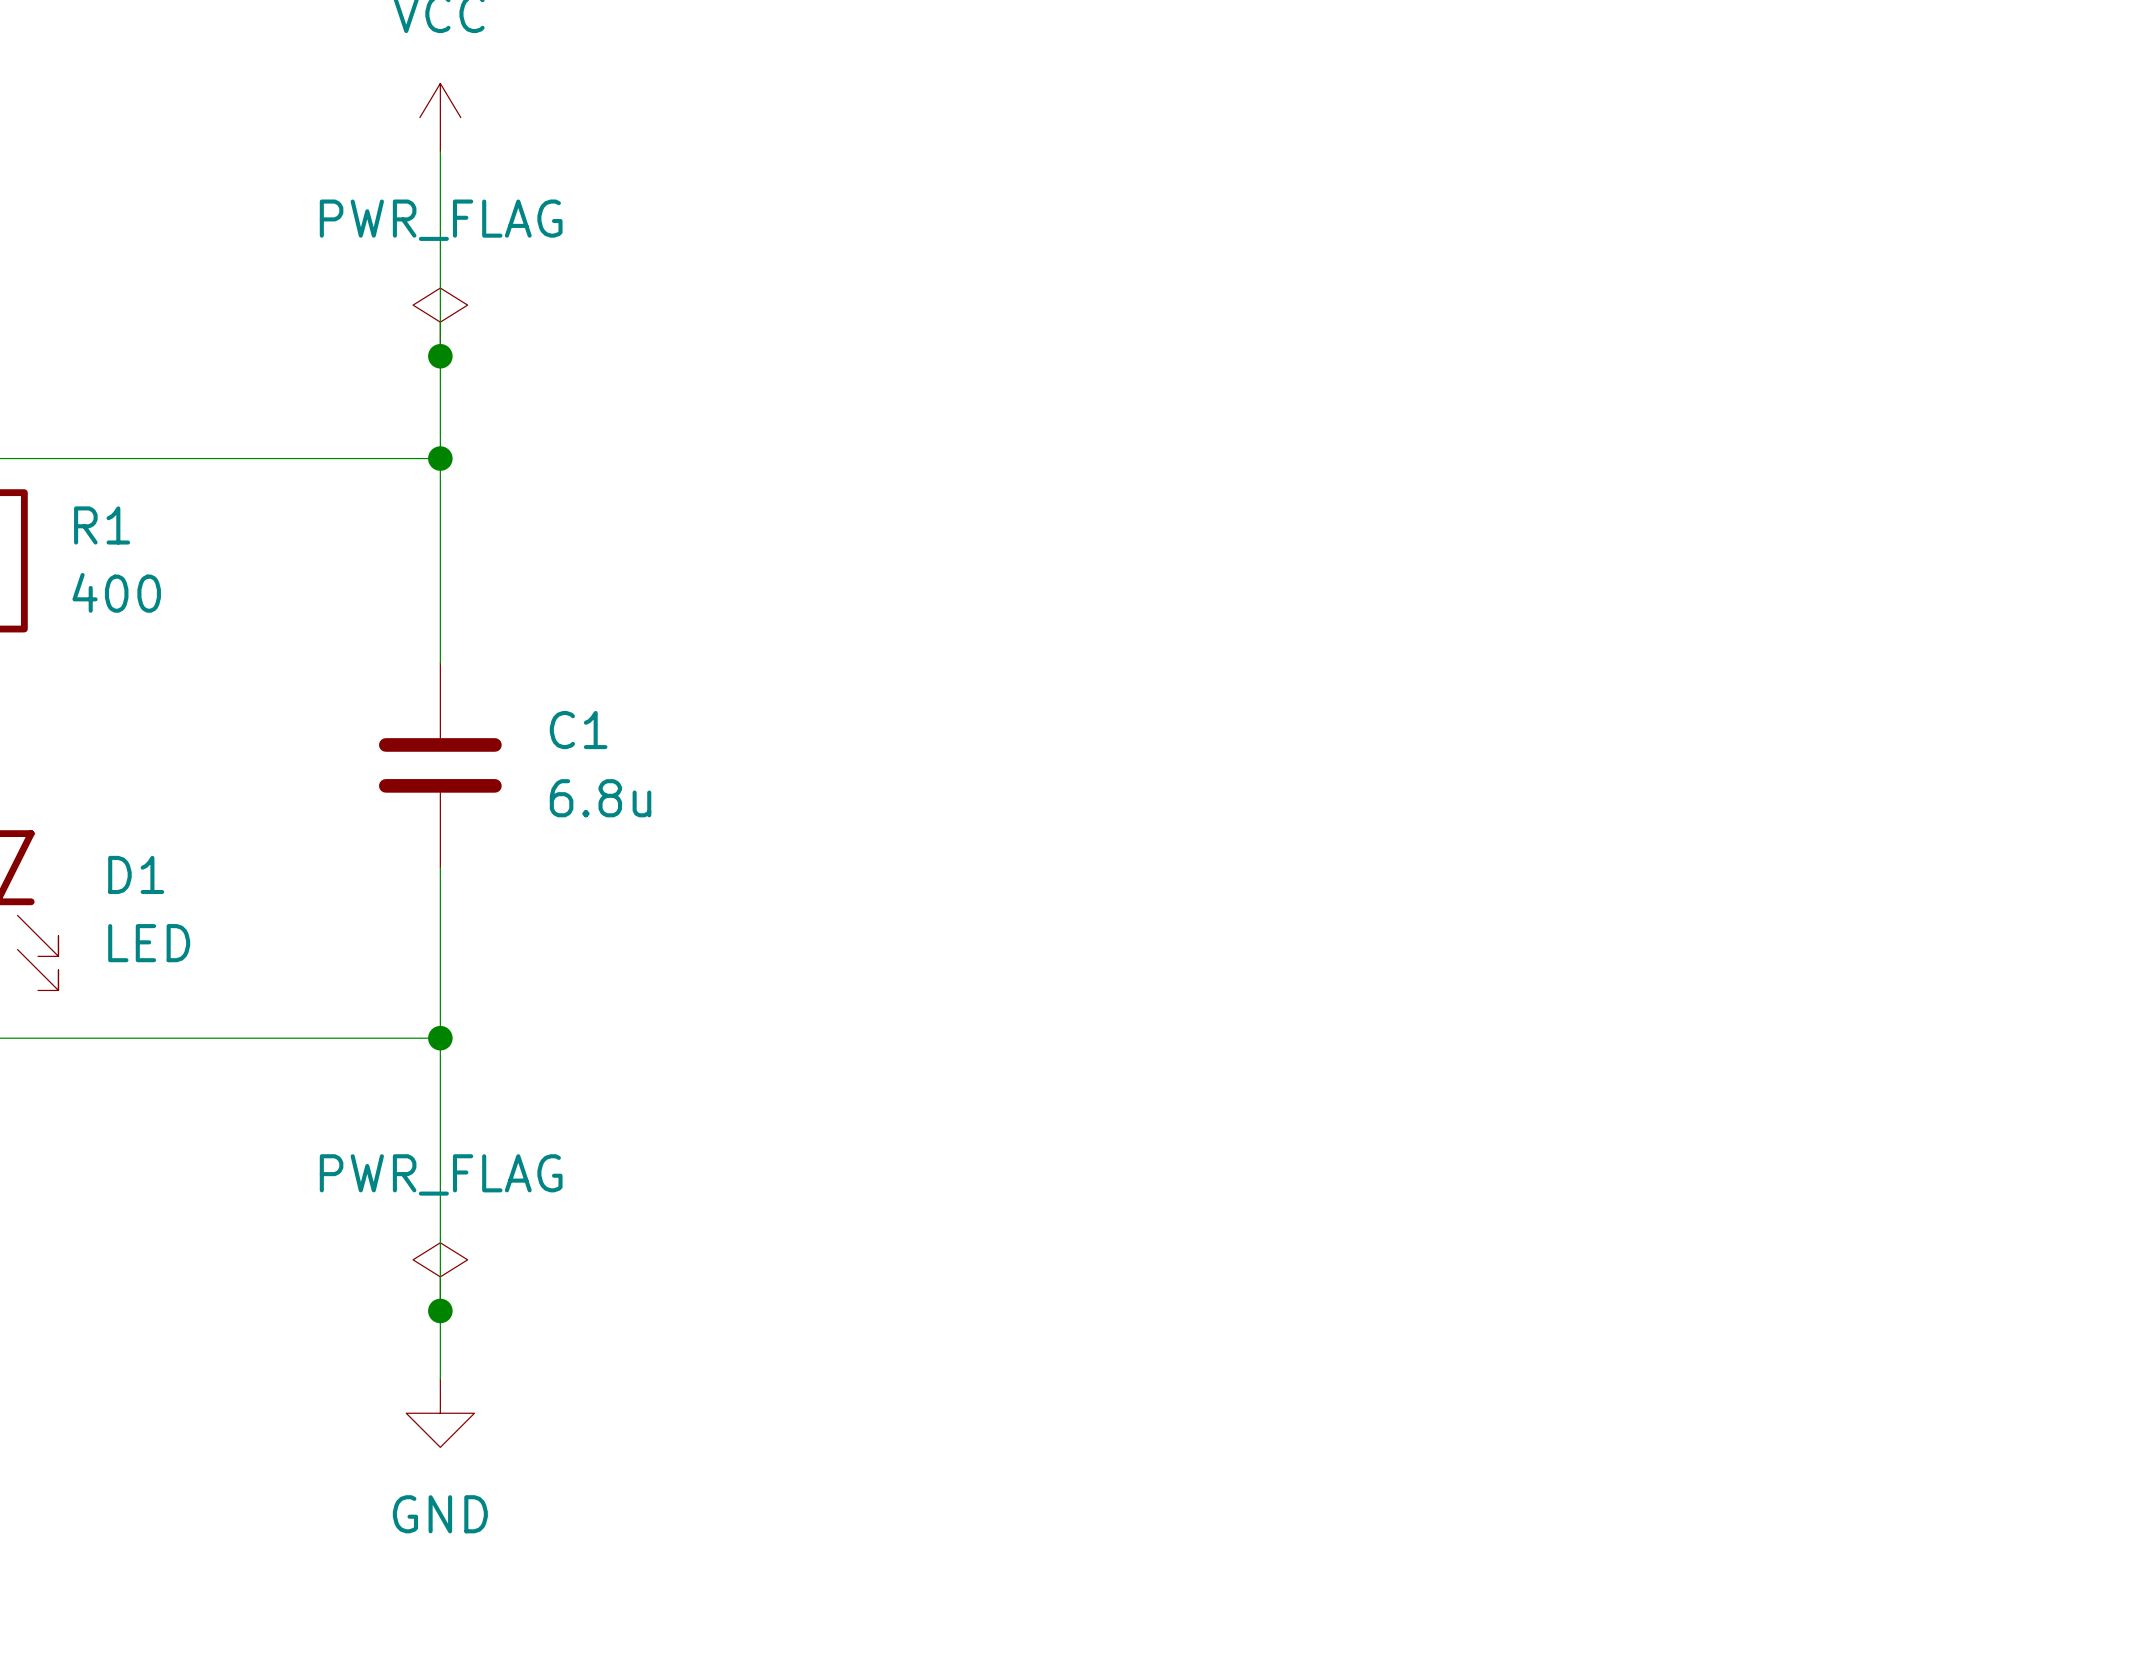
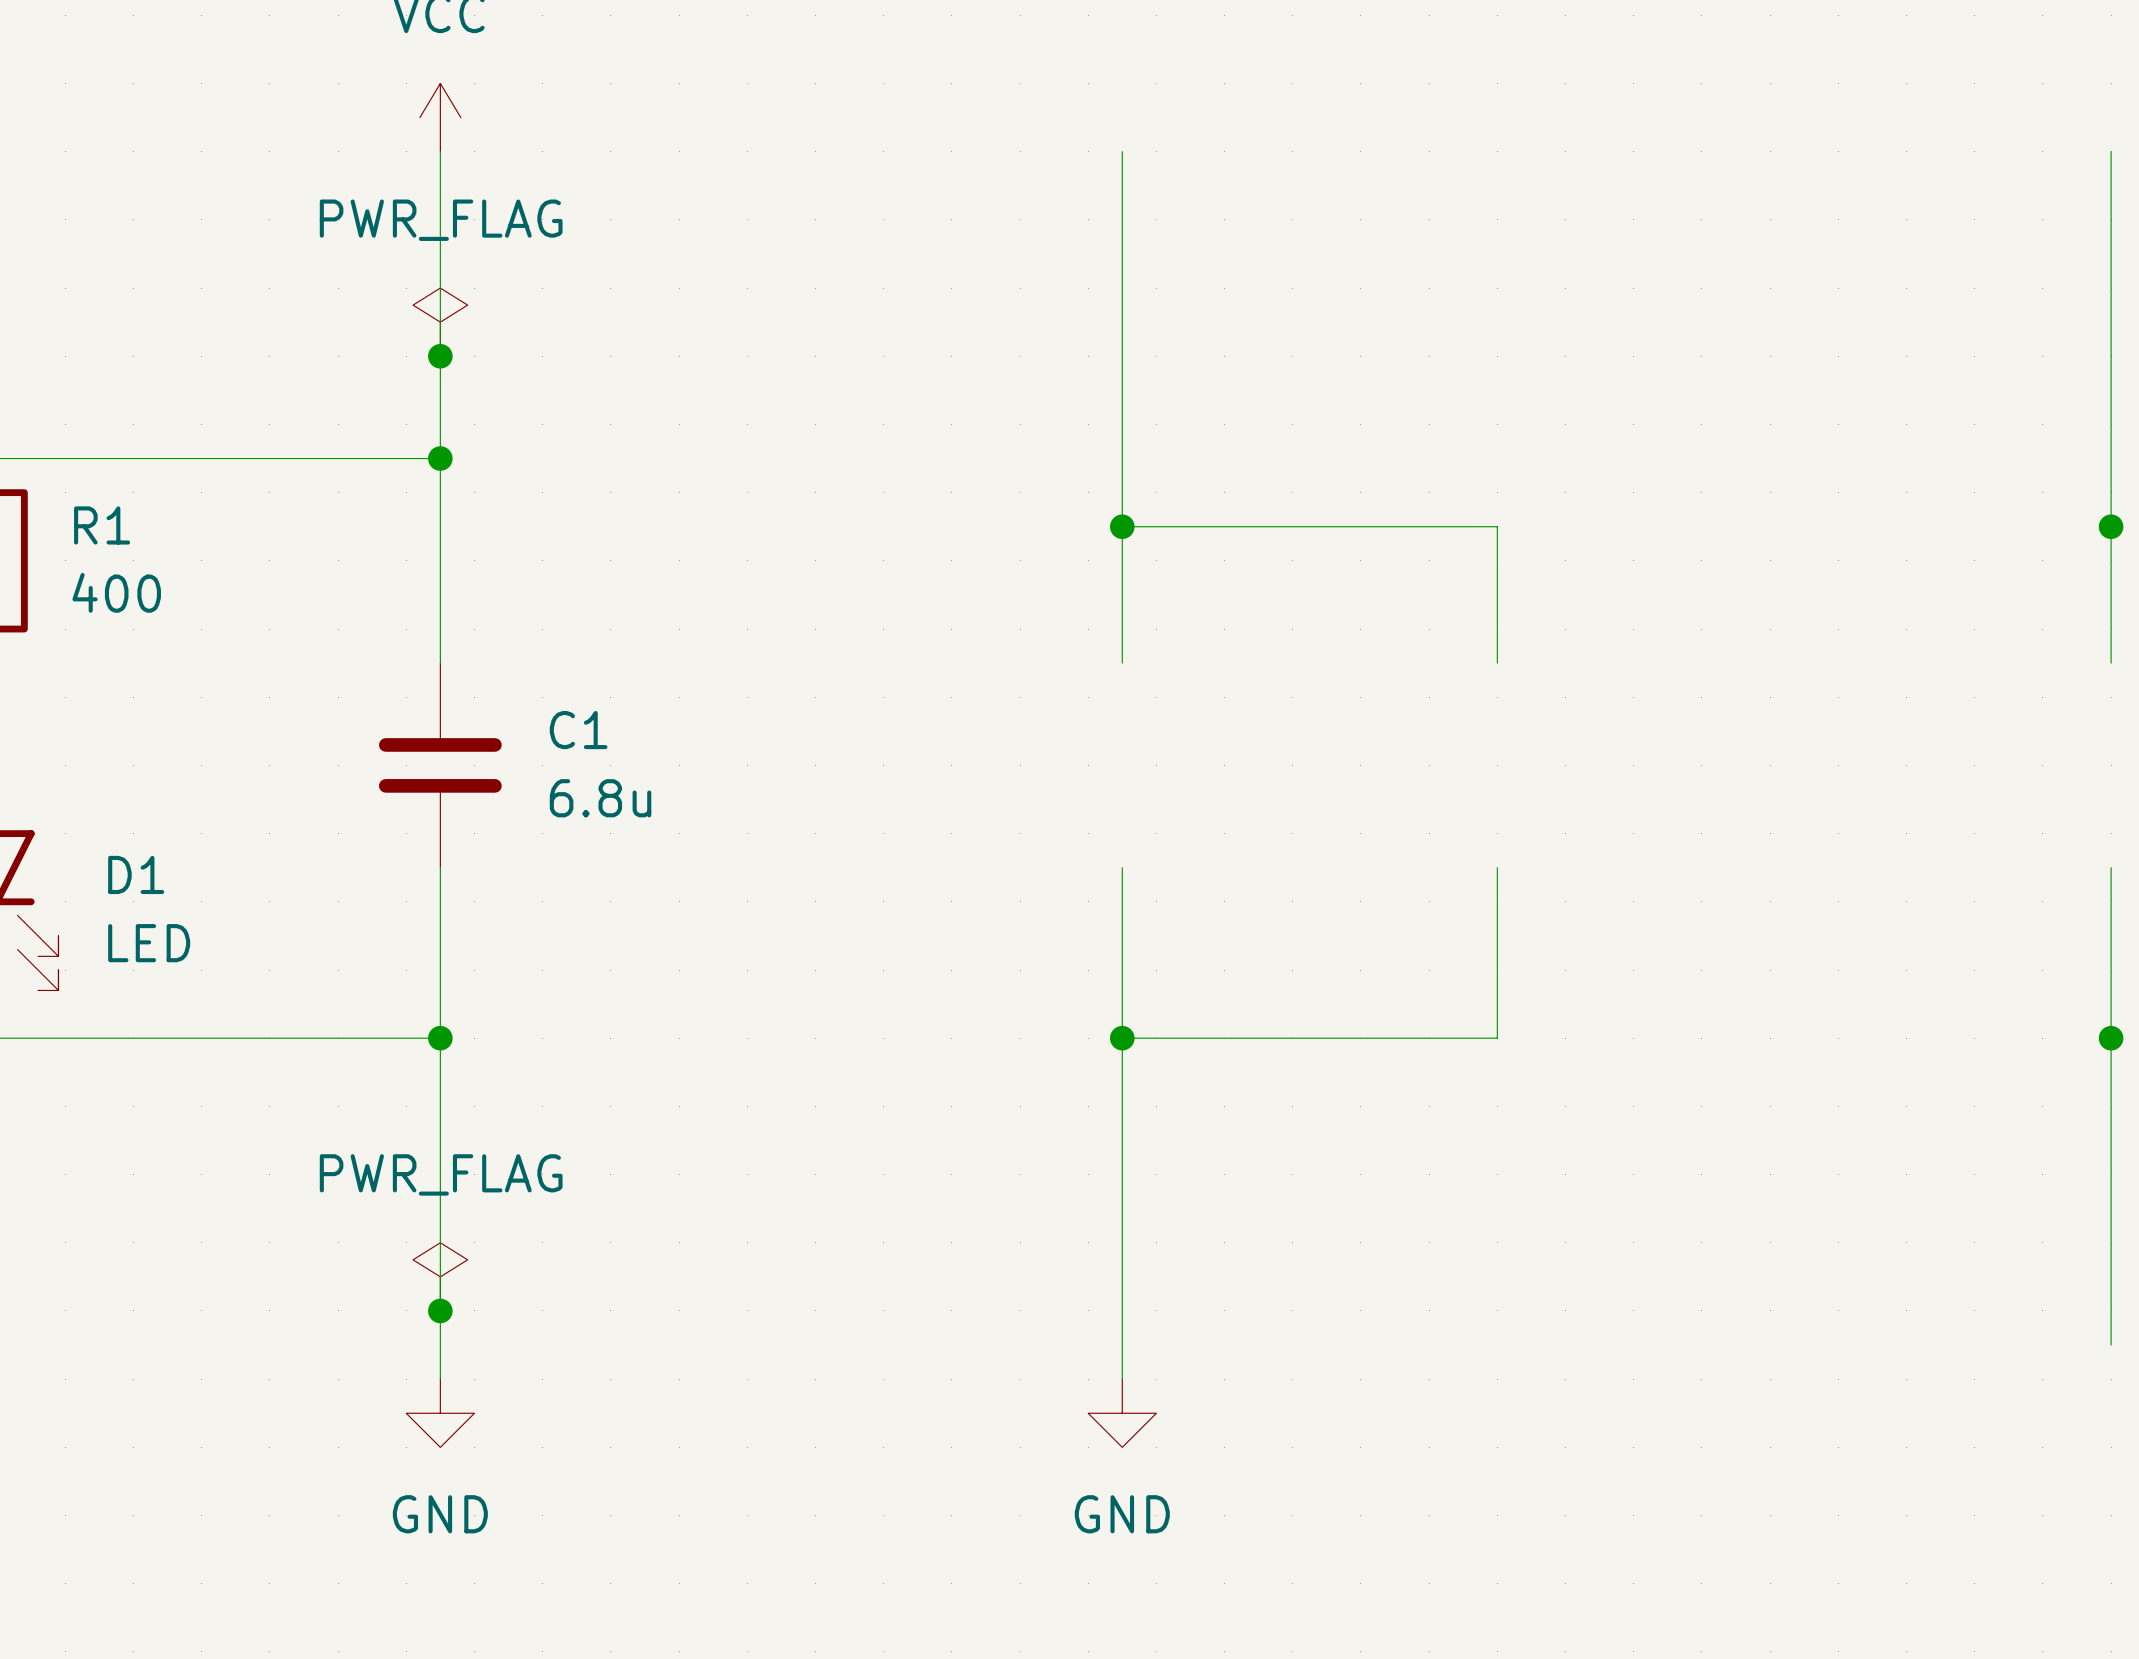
wire: none -> (1122, 151) (1122, 663)
wire: none -> (2111, 151) (2111, 663)
wire: none -> (1122, 526) (1497, 526) (1497, 663)
junction: none -> (1122, 526)
junction: none -> (2111, 526)
wire: none -> (1122, 867) (1122, 1379)
wire: none -> (1497, 867) (1497, 1038) (1122, 1038)
wire: none -> (2111, 867) (2111, 1345)
junction: none -> (1122, 1038)
junction: none -> (2111, 1038)
power symbol: none -> GND (1122, 1413)

